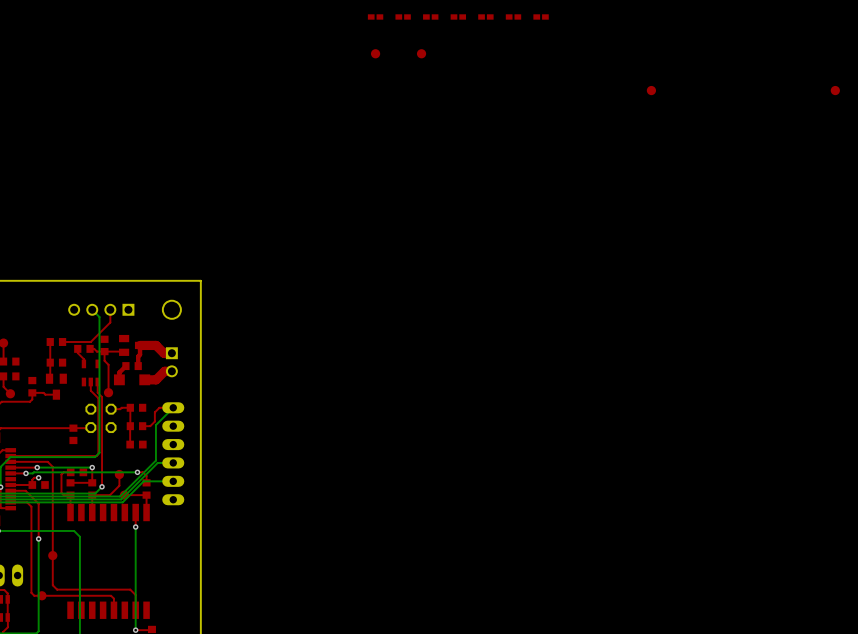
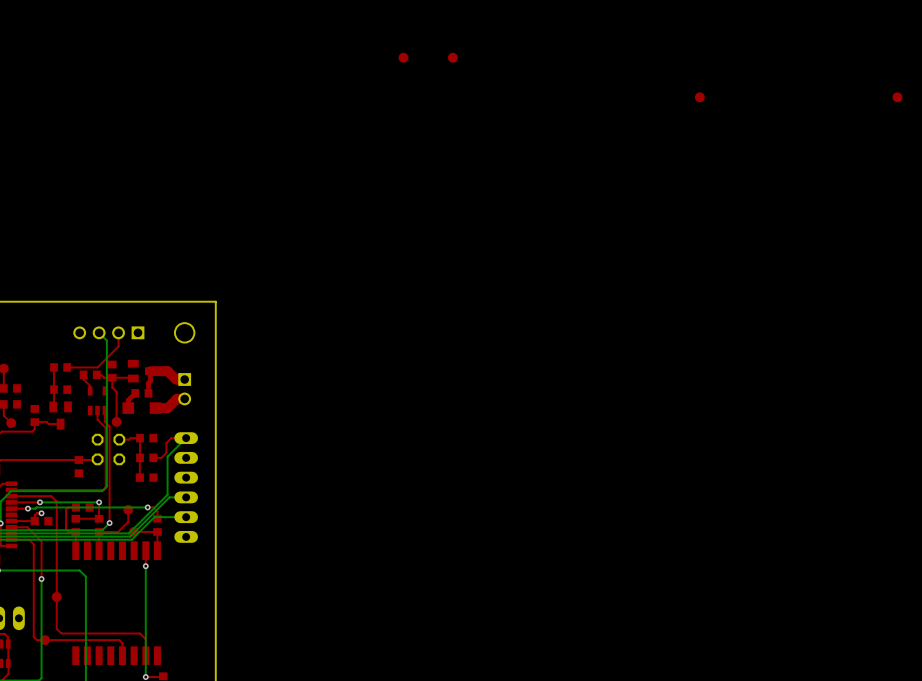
part: (375, 16) -> none
part: (403, 16) -> none
part: (430, 16) -> none
part: (458, 16) -> none
part: (485, 16) -> none
part: (513, 16) -> none
part: (541, 16) -> none

